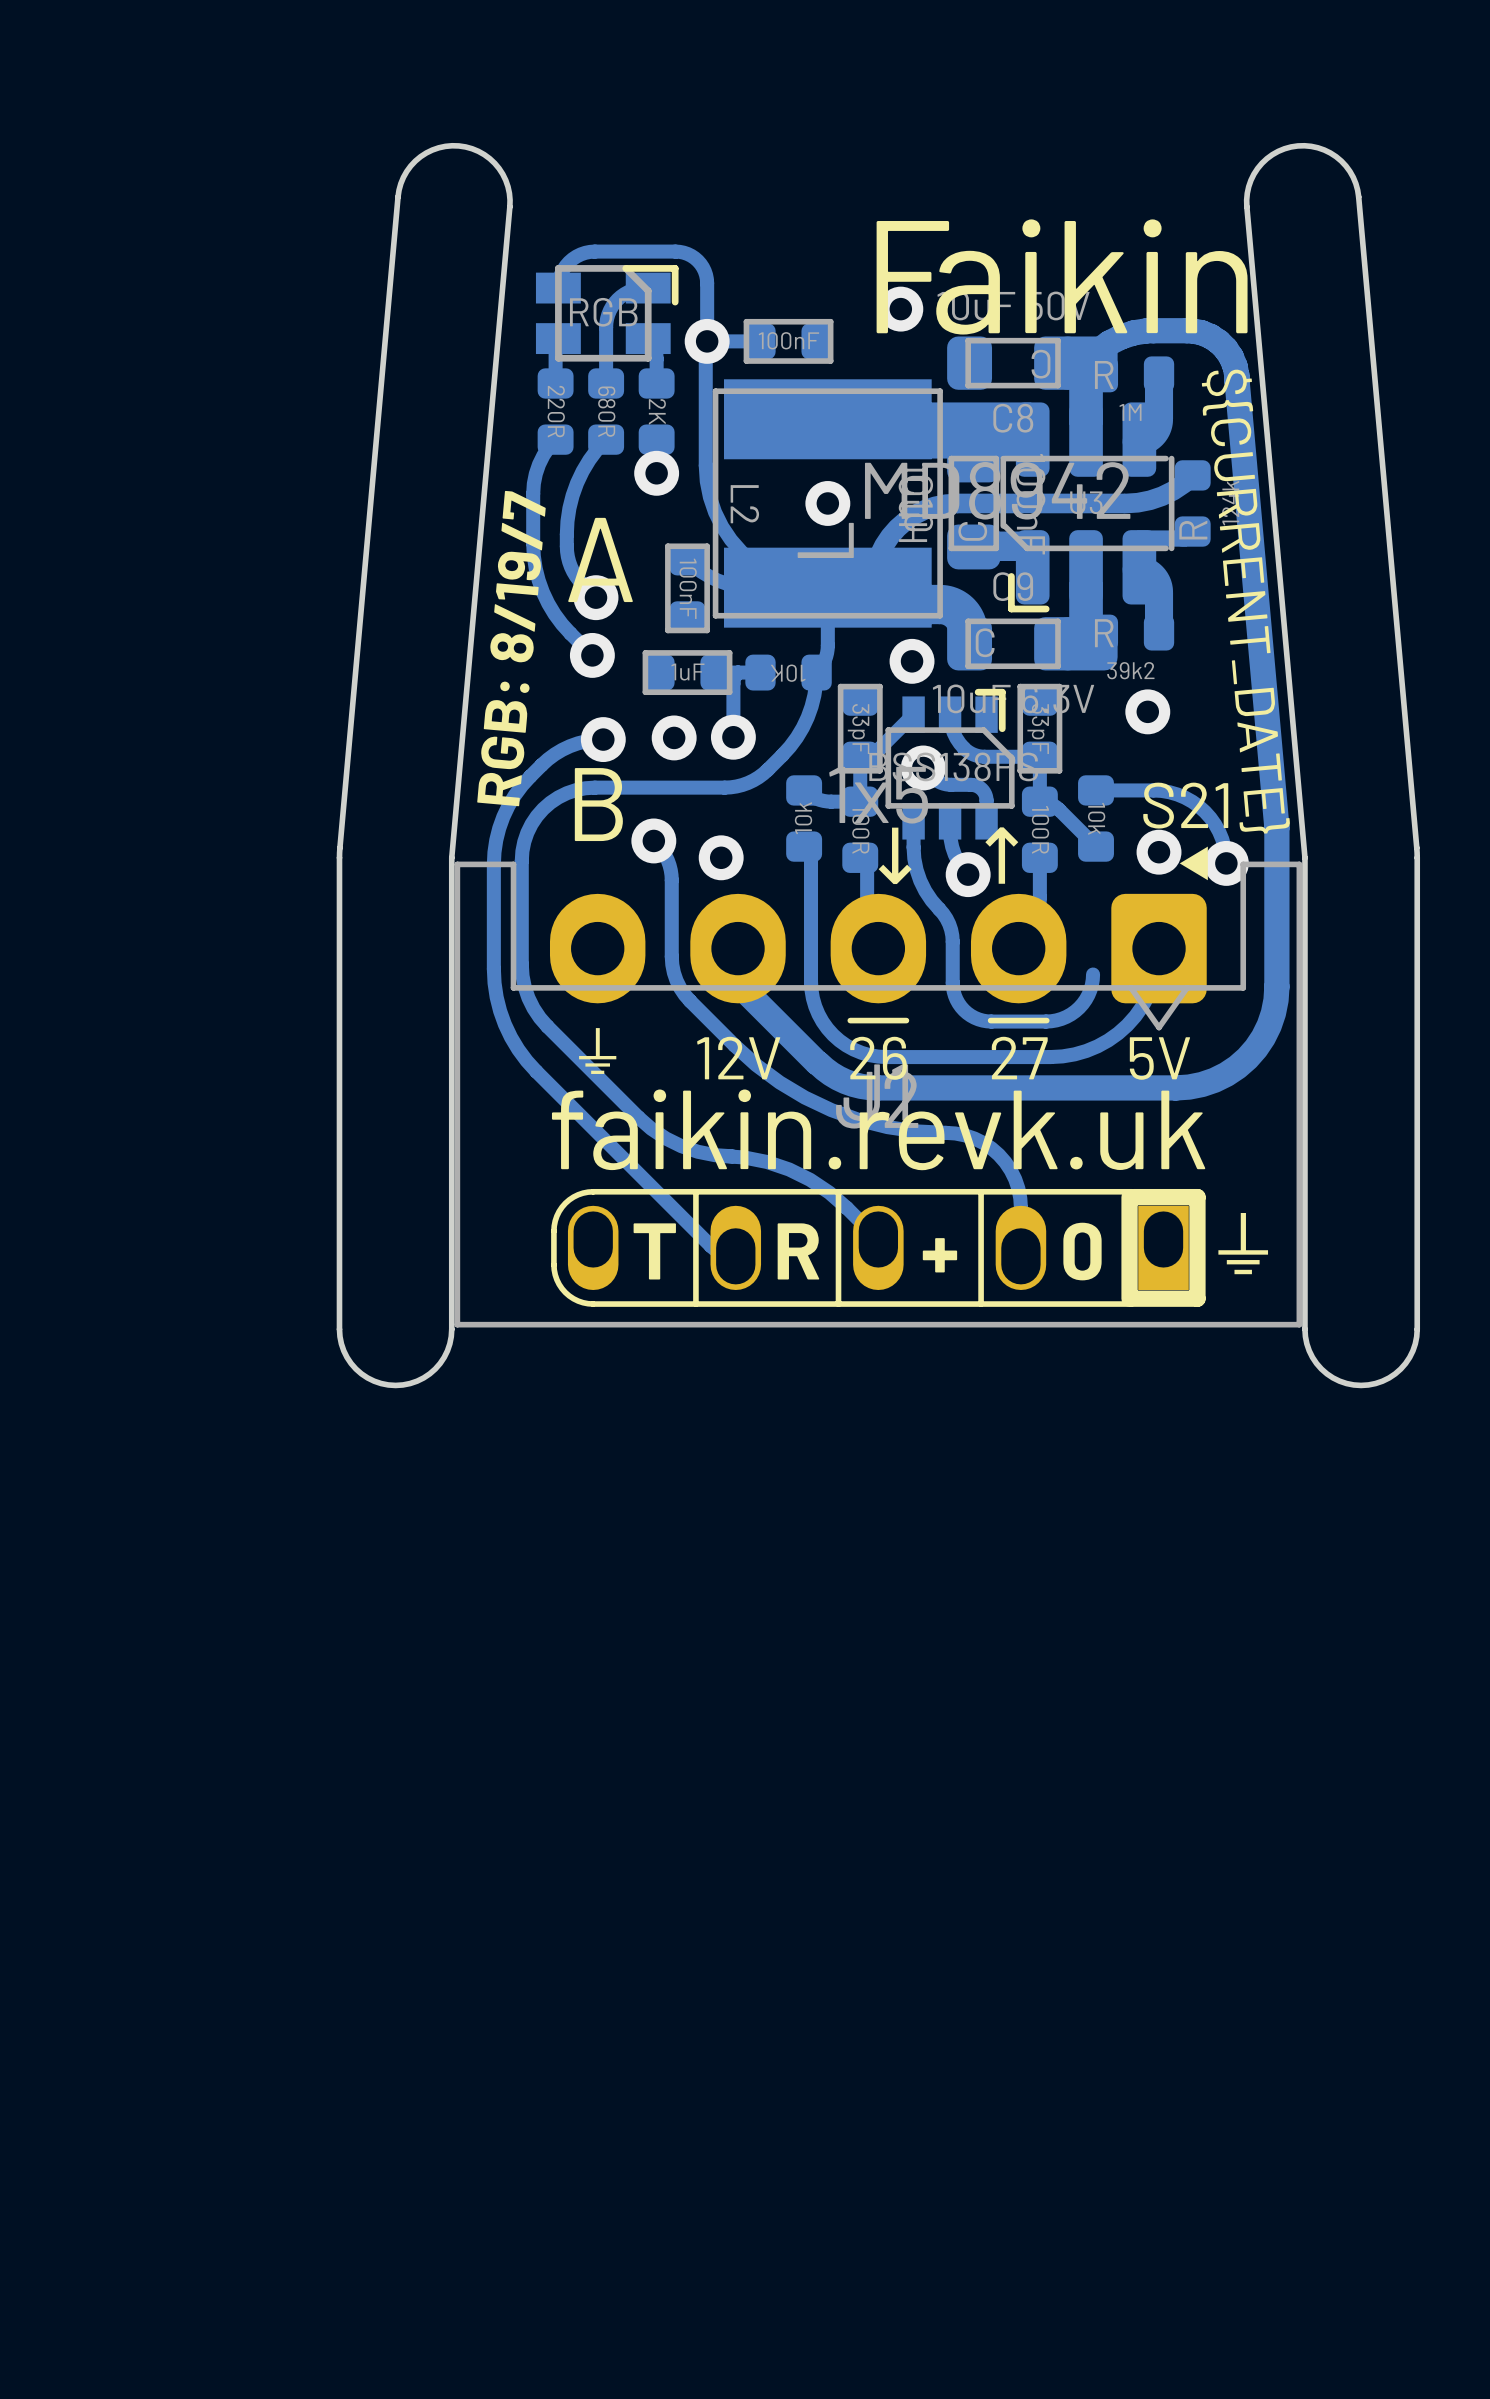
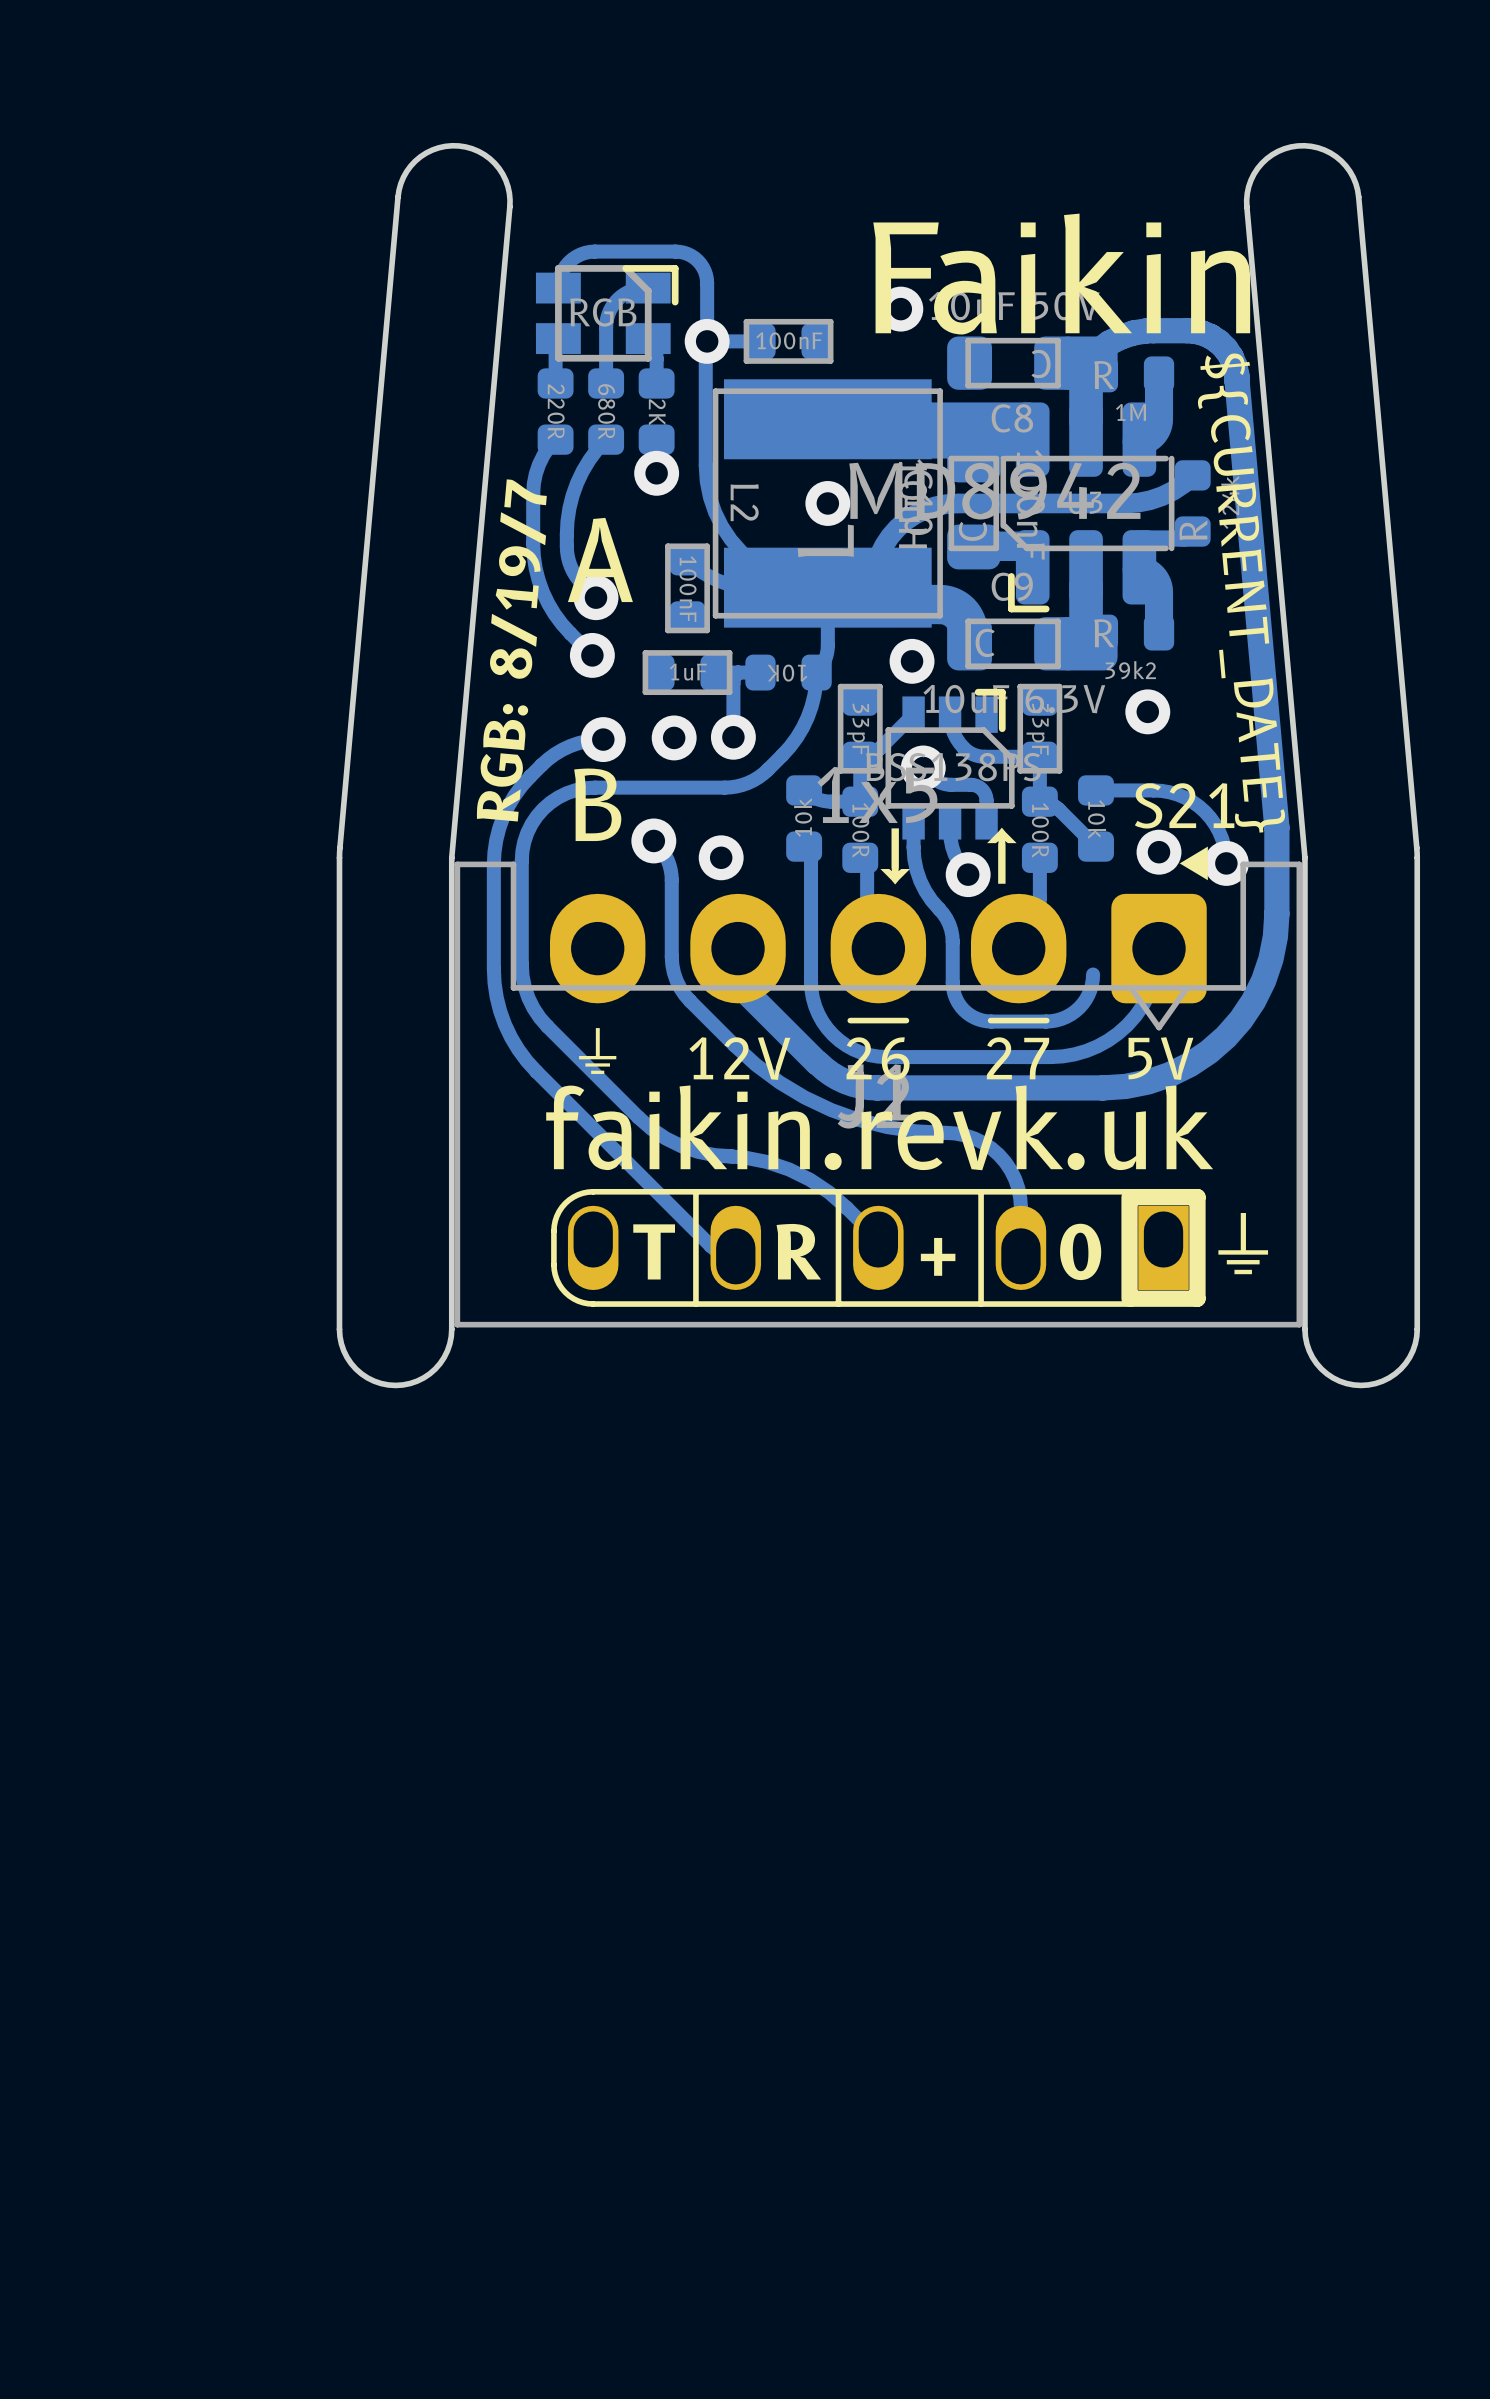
track: (1276, 913) (1276, 986) (1273, 1013) (1263, 1037) (1247, 1058) (1226, 1074) (1202, 1084) (1175, 1087) (1102, 1087) -> (1276, 913) (1270, 958) (1263, 980) (1253, 1000) (1225, 1036) (1208, 1051) (1169, 1074) (1147, 1082) (1102, 1087)

